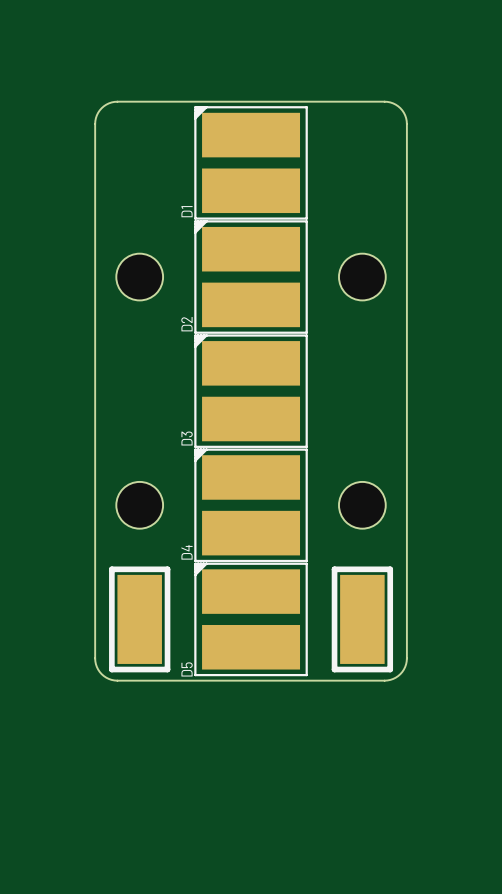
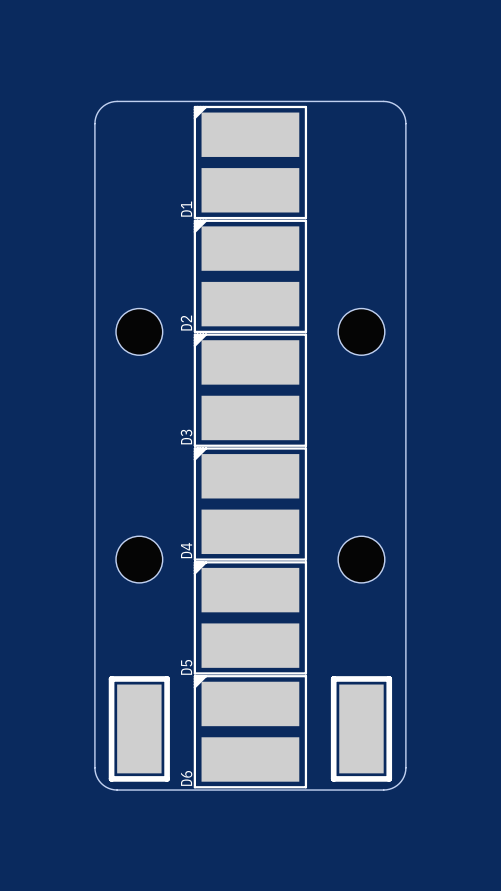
hole position: (139, 277) -> (139, 331)
hole position: (362, 277) -> (361, 331)
hole position: (139, 505) -> (139, 559)
hole position: (362, 505) -> (361, 559)
part position: (139, 619) -> (139, 728)
part position: (362, 619) -> (361, 728)
board edge: (95, 658) (96, 666) (101, 674) (108, 678) (117, 680) (387, 680) (395, 677) (402, 671) (406, 658) -> (94, 656) (95, 770) (97, 778) (103, 785) (117, 790) (383, 790) (392, 788) (401, 781) (405, 770) (405, 656)
D6: none -> (250, 731)

